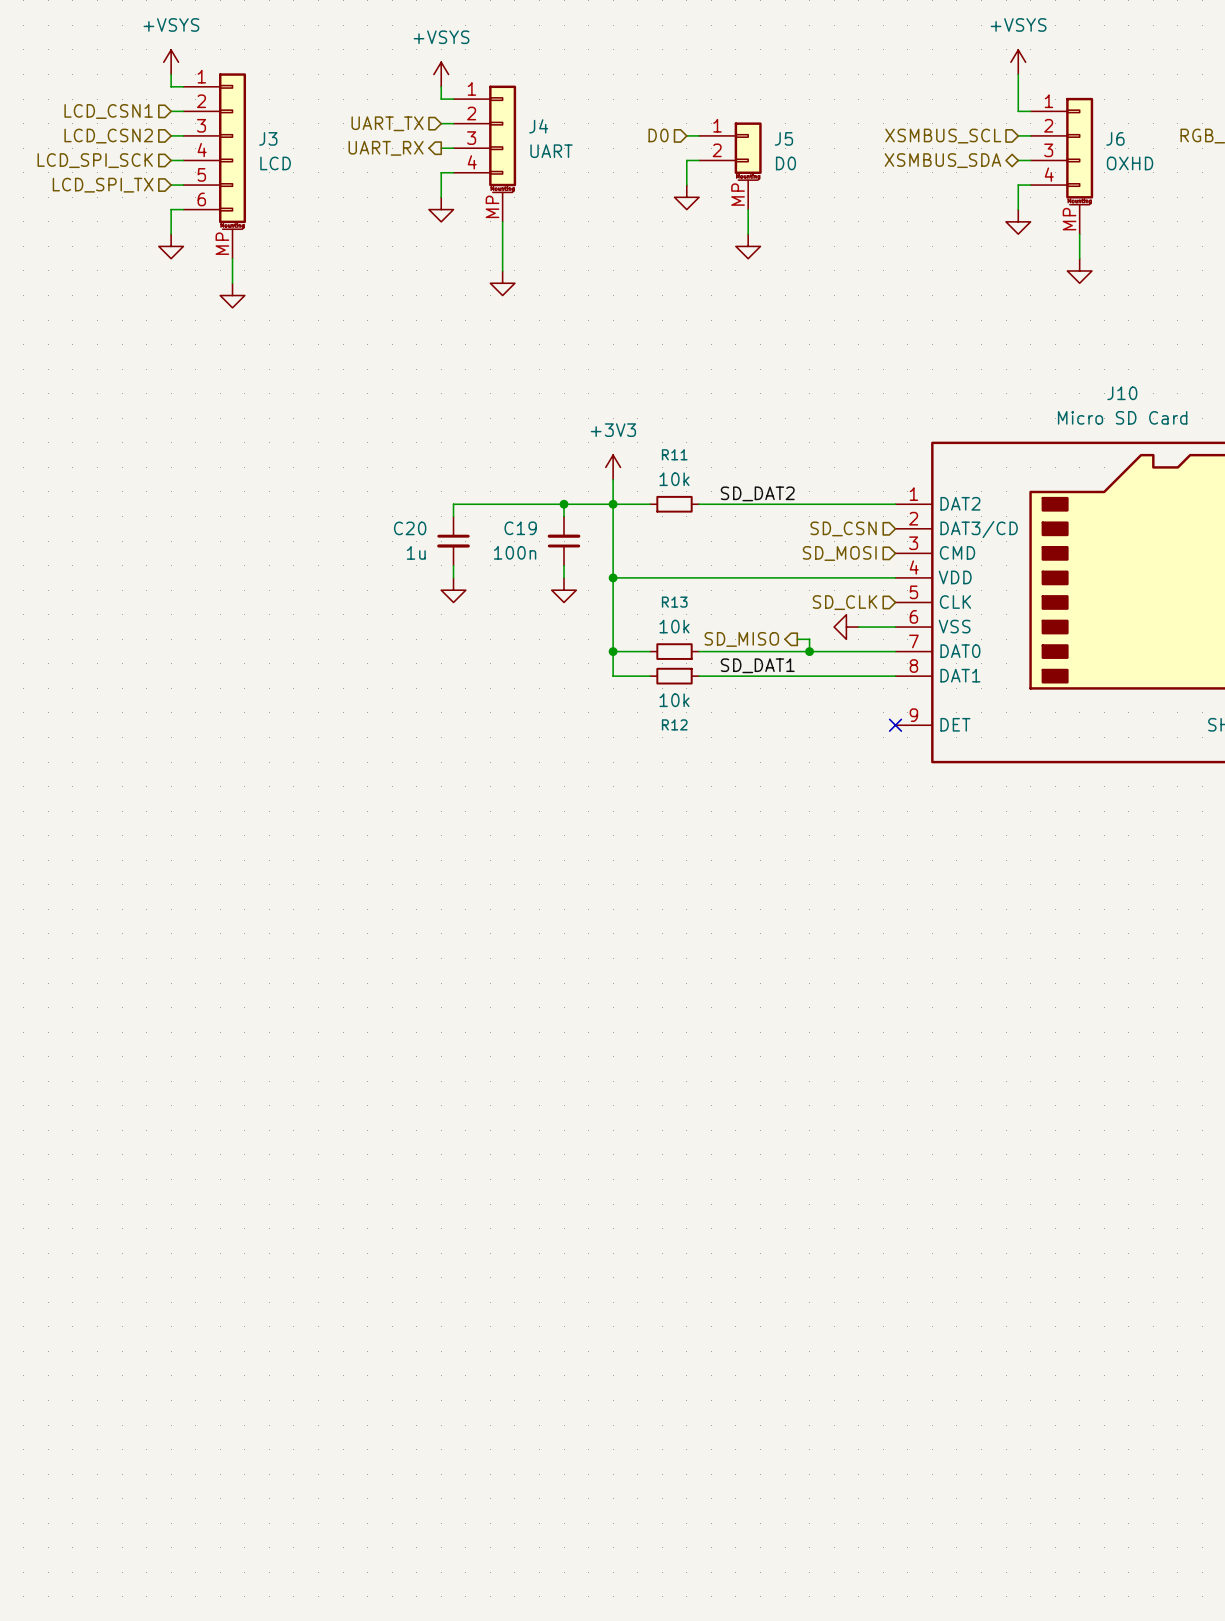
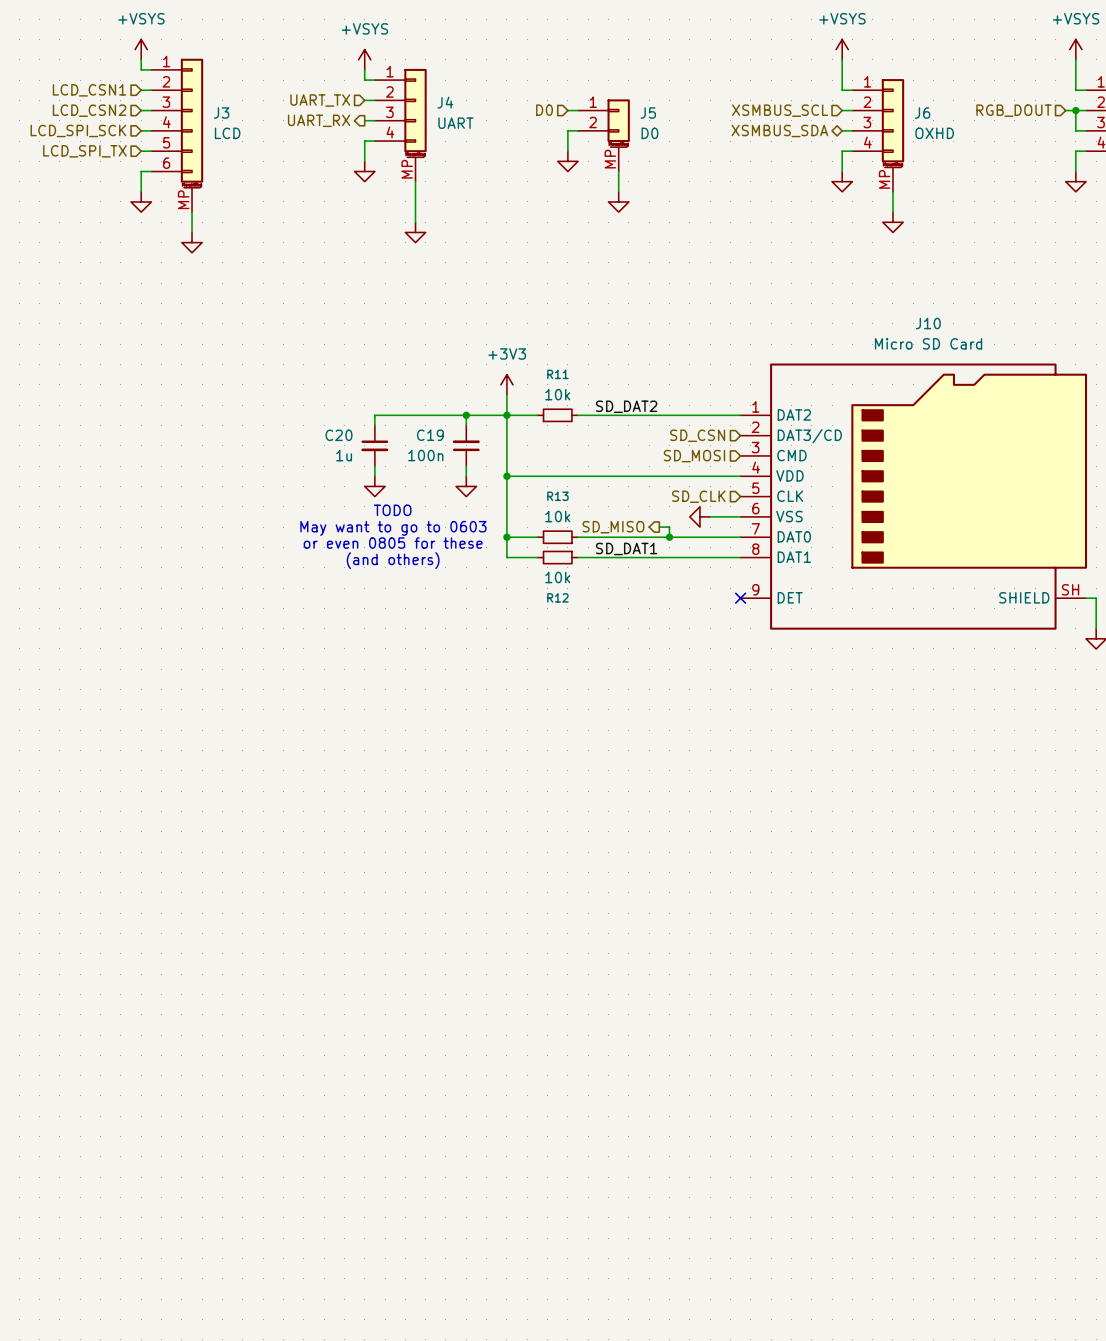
text: none -> TODO (392, 510)
text: none -> May want to go to 0603 (393, 528)
text: none -> or even 0805 for these (393, 543)
text: none -> (and others) (393, 560)

